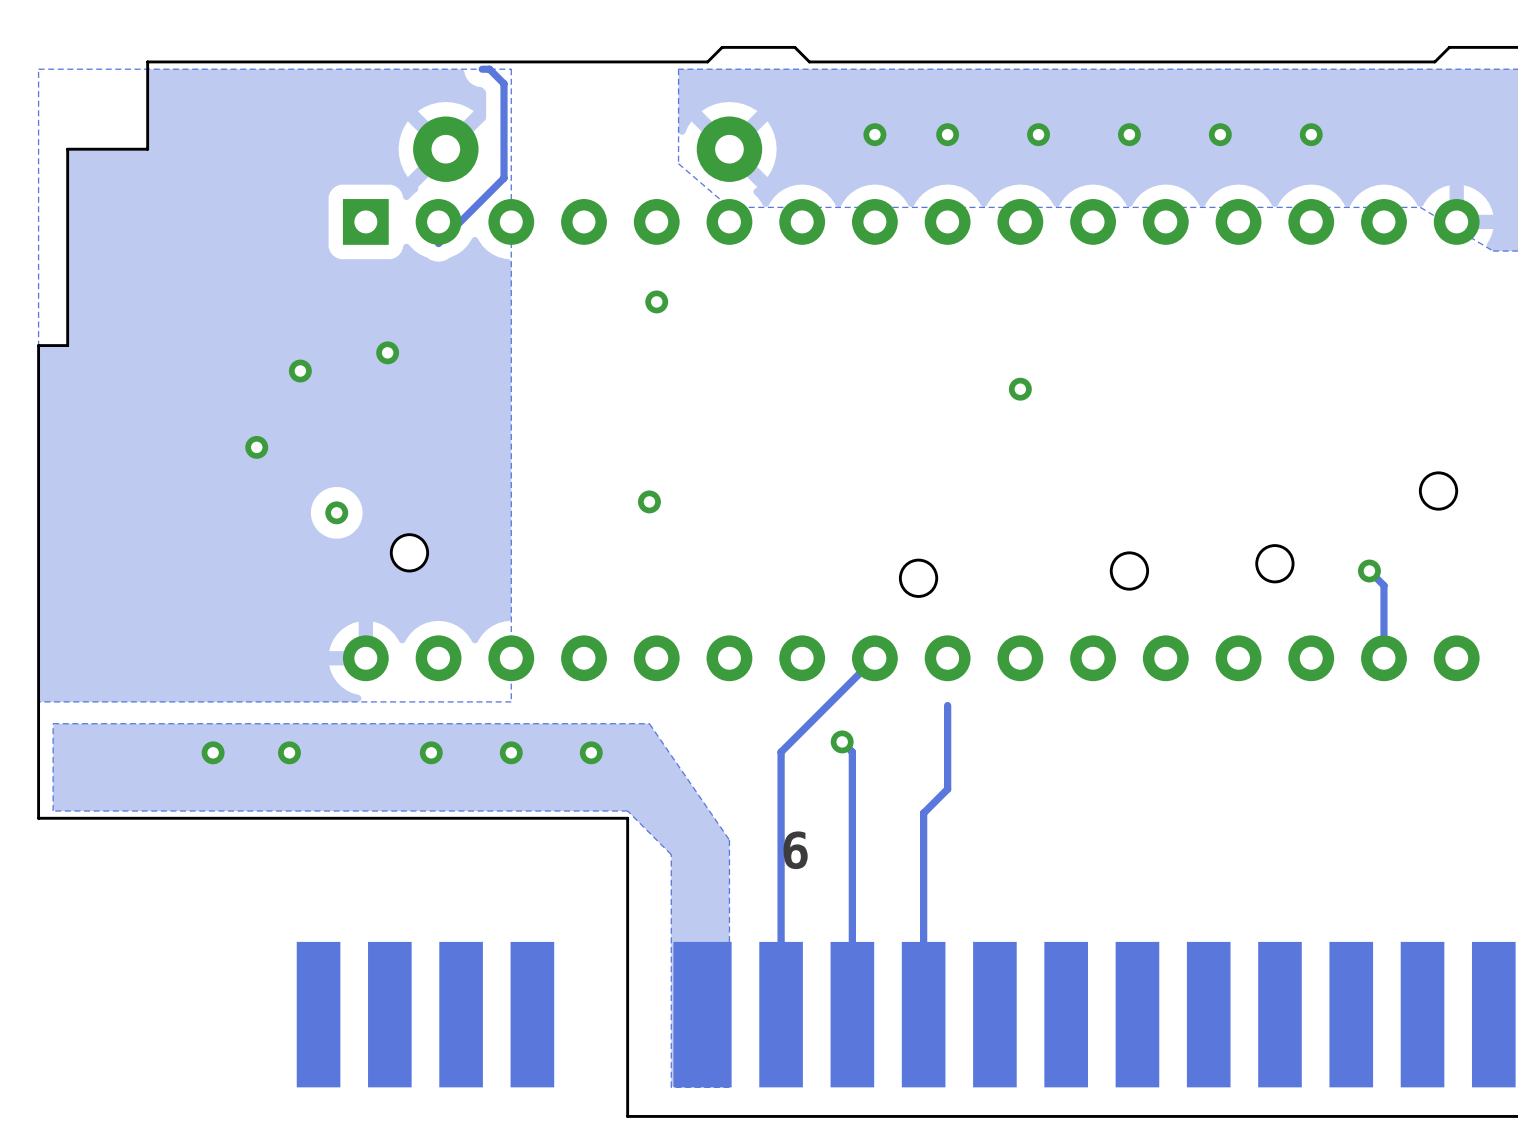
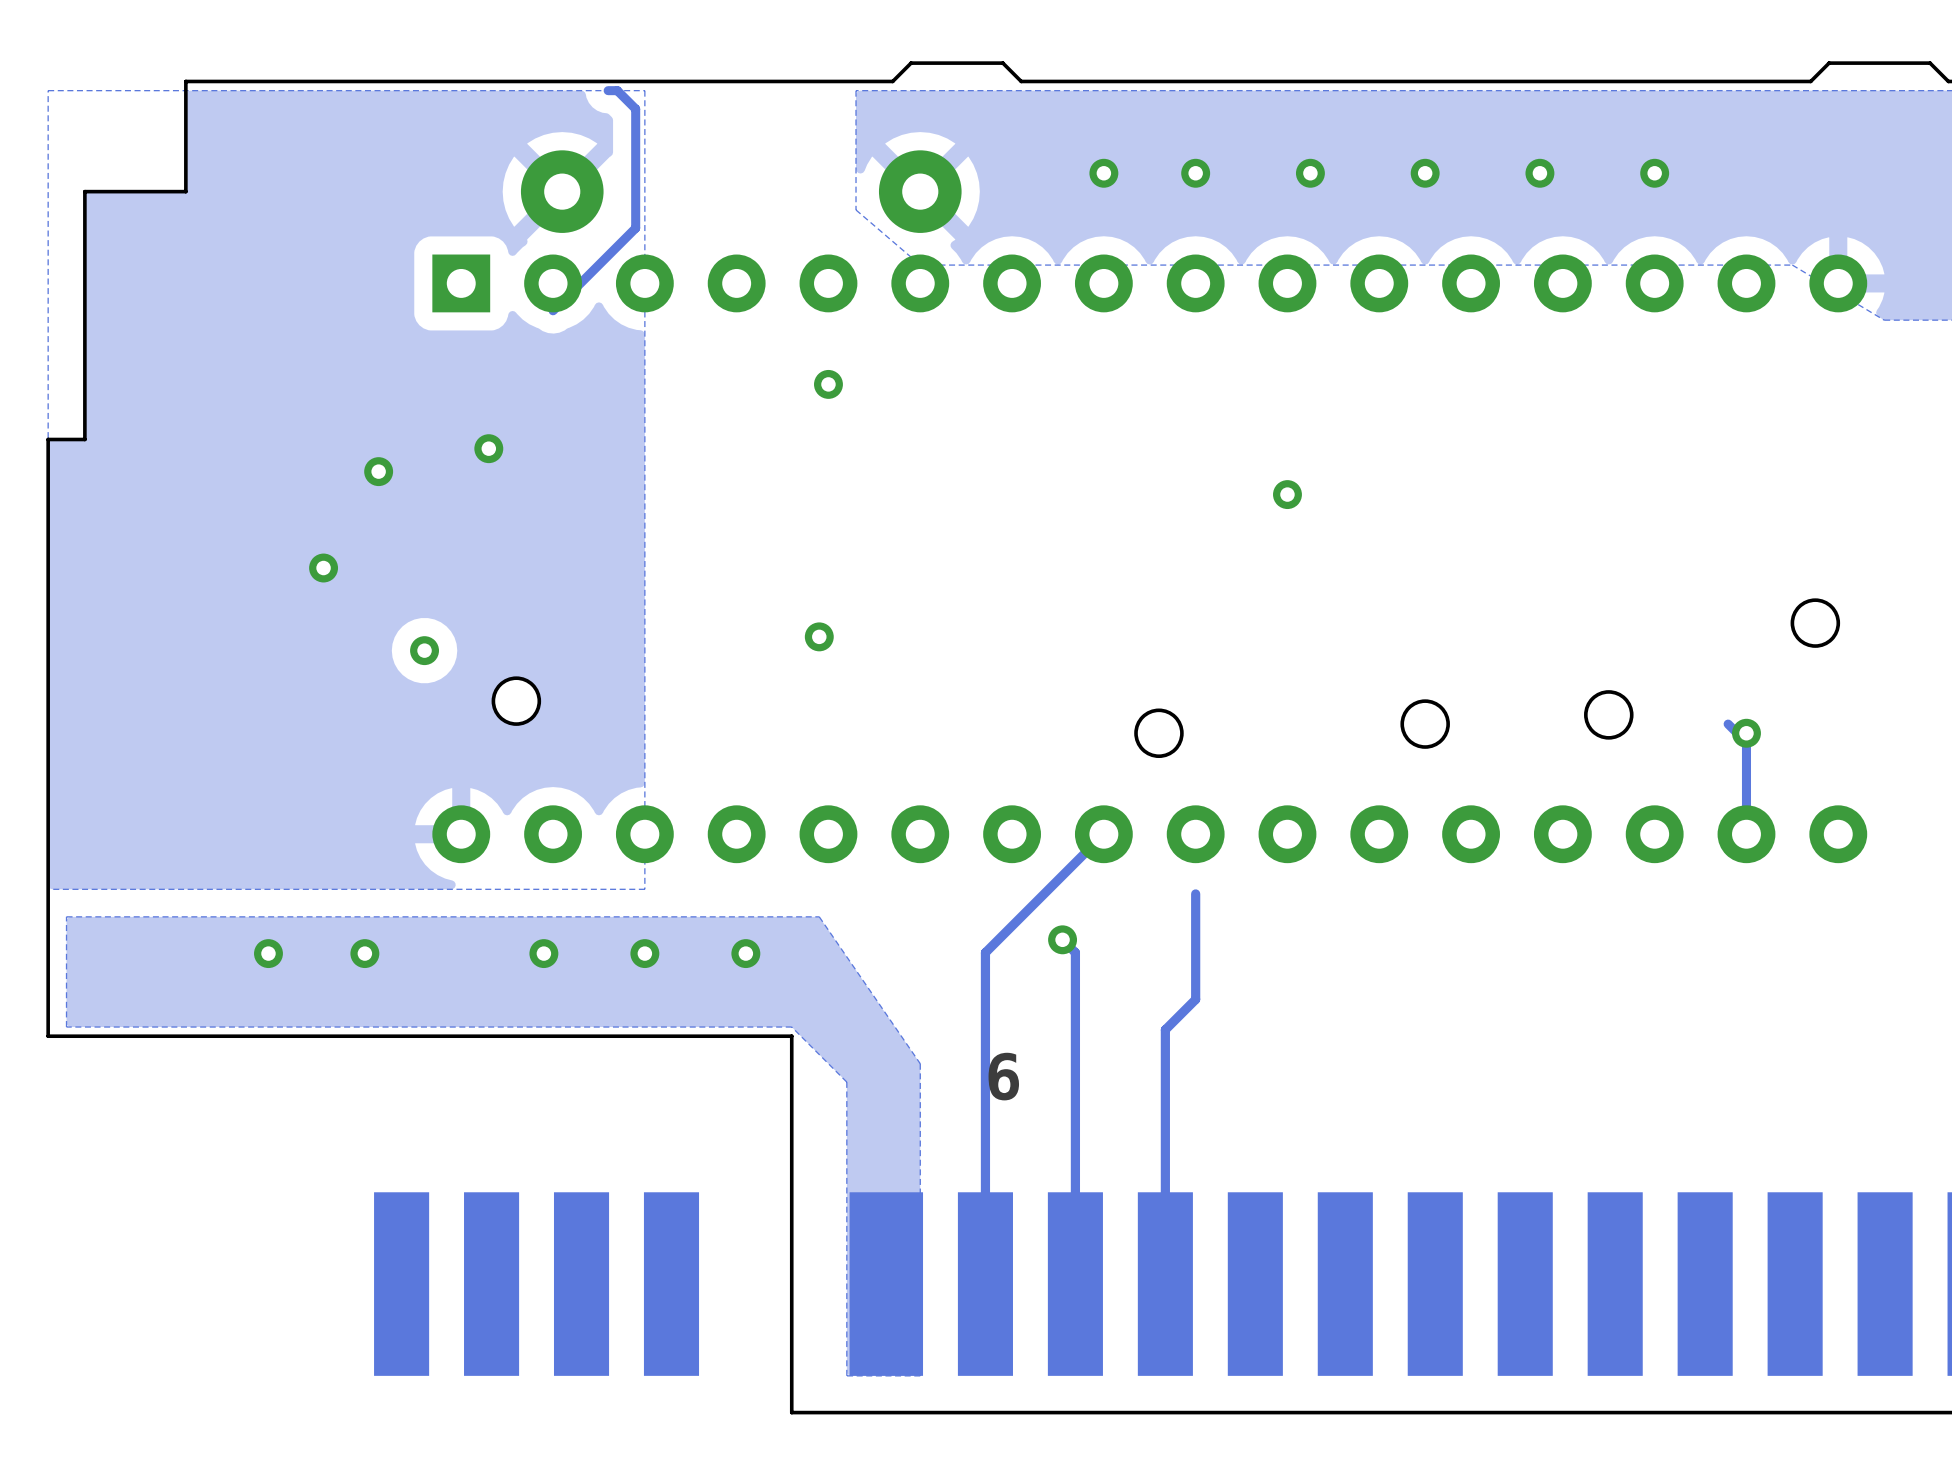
via position: (1369, 571) -> (1746, 733)

